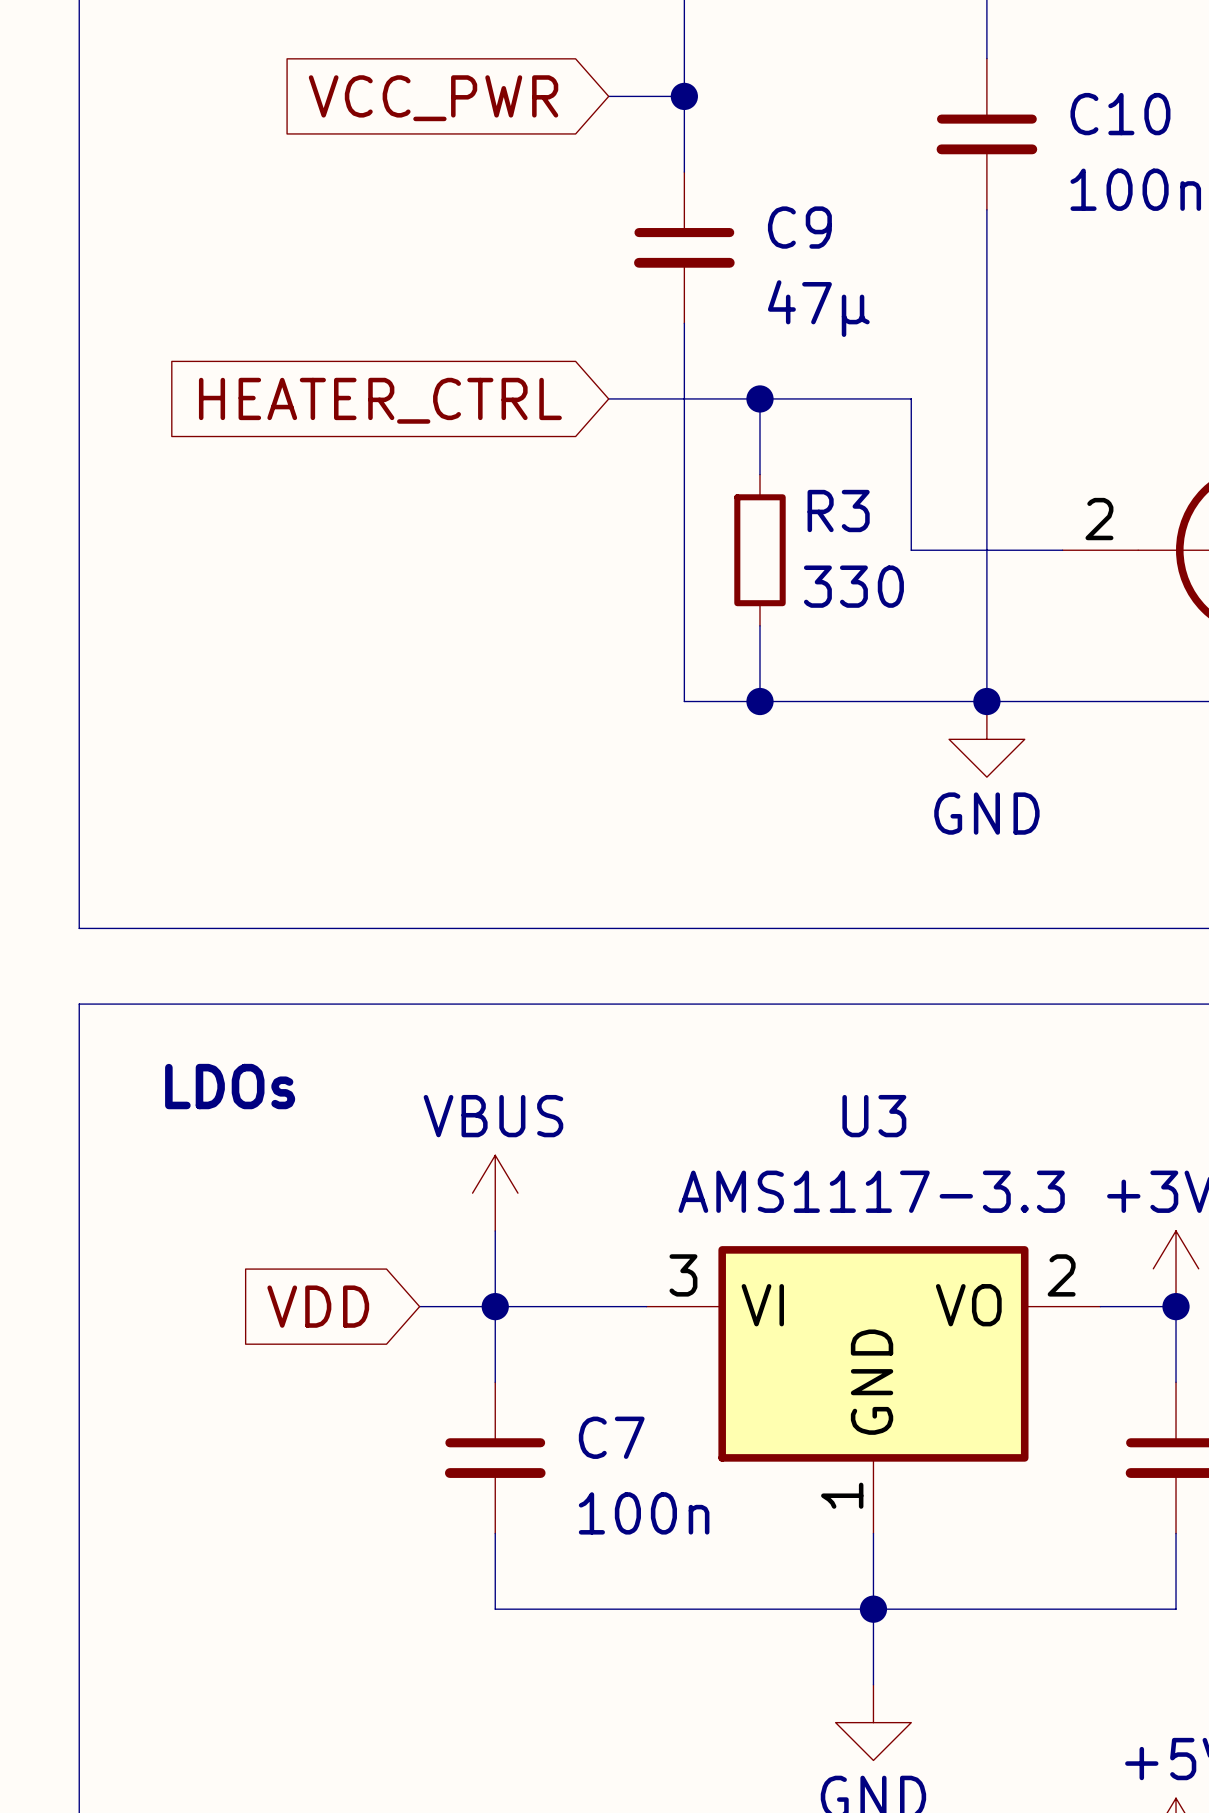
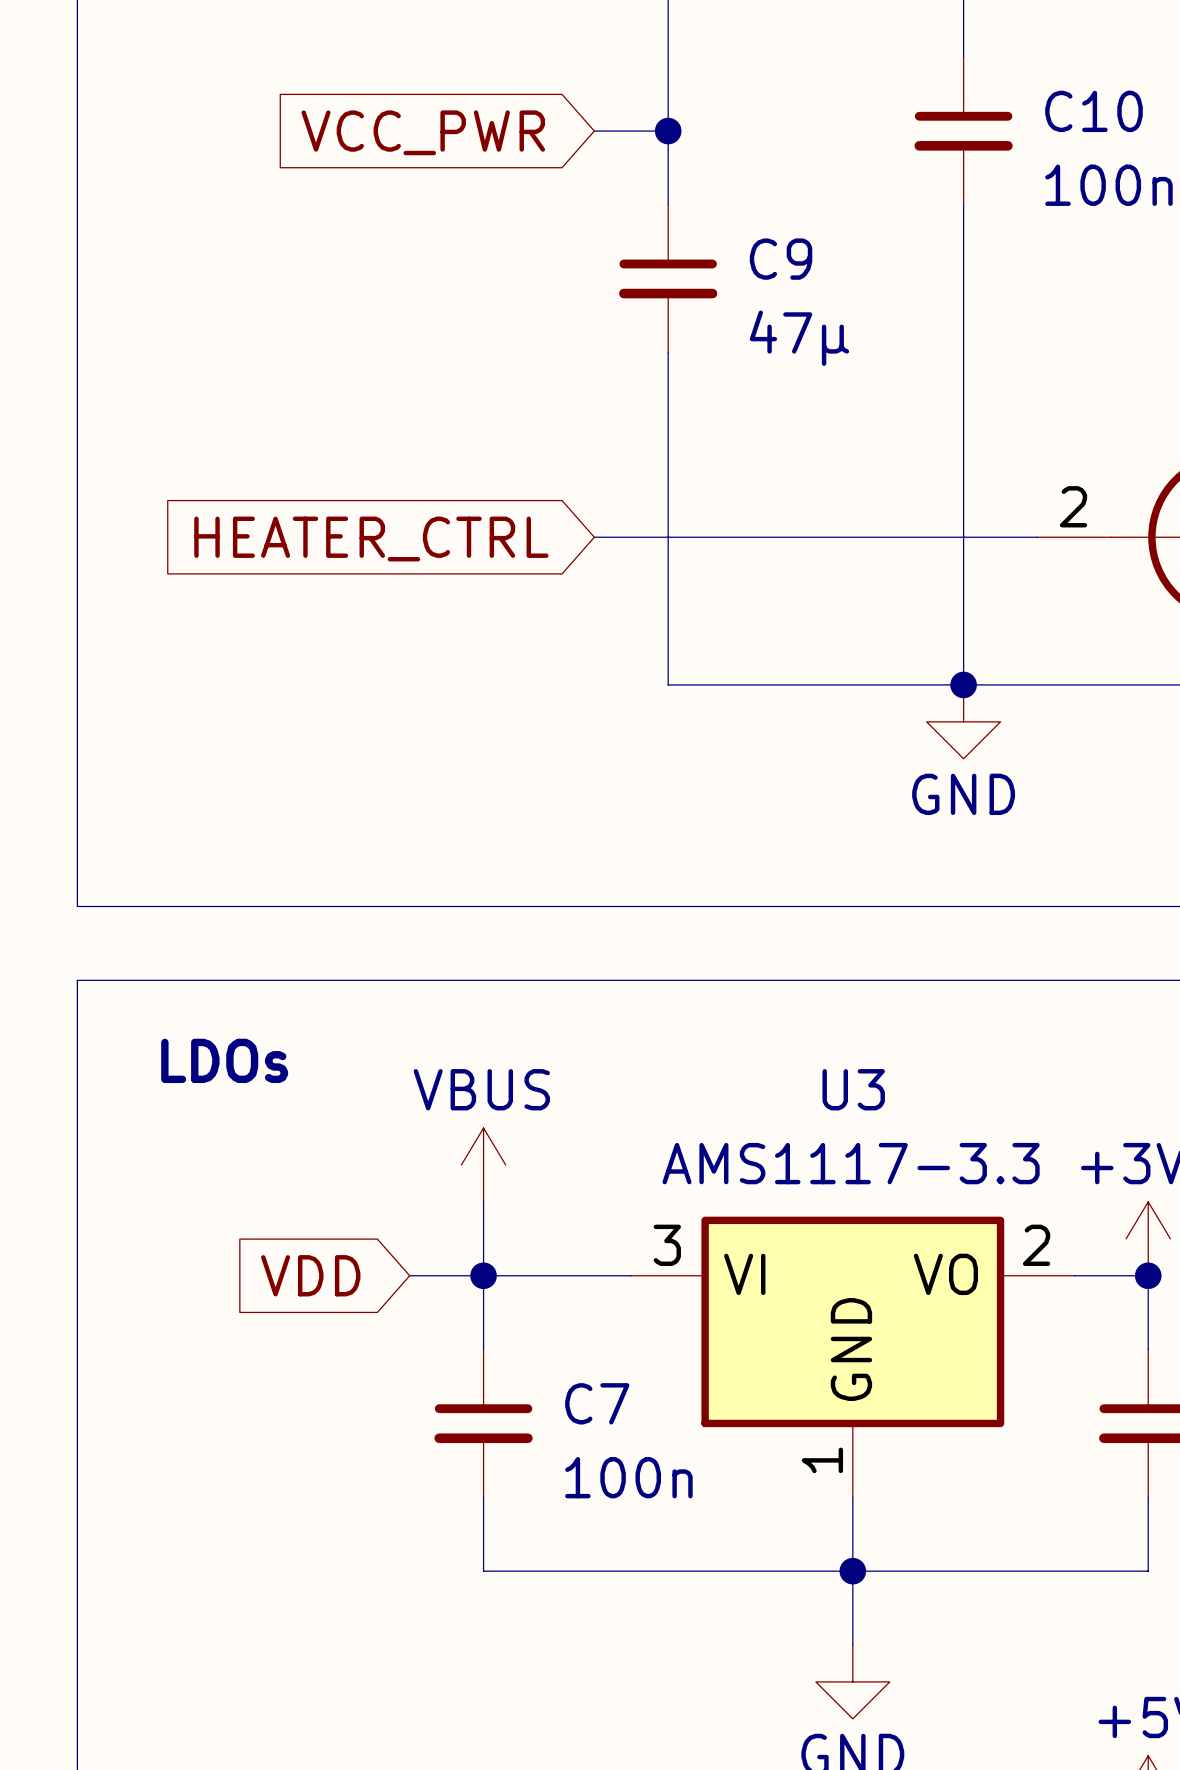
wire: (608, 96) (684, 96) -> (594, 131) (668, 131)
junction position: (684, 96) -> (668, 131)
global label position: VCC_PWR (433, 98) -> VCC_PWR (423, 132)
C9 position: (684, 247) -> (668, 278)
wire: (608, 398) (911, 398) (911, 550) -> (594, 537) (889, 537)
wire: (759, 398) (759, 474) -> none
junction: (759, 398) -> none
global label position: HEATER_CTRL (380, 400) -> HEATER_CTRL (371, 539)
R3: 330 (759, 550) -> none
wire: (759, 625) (759, 701) -> none
junction: (759, 701) -> none

